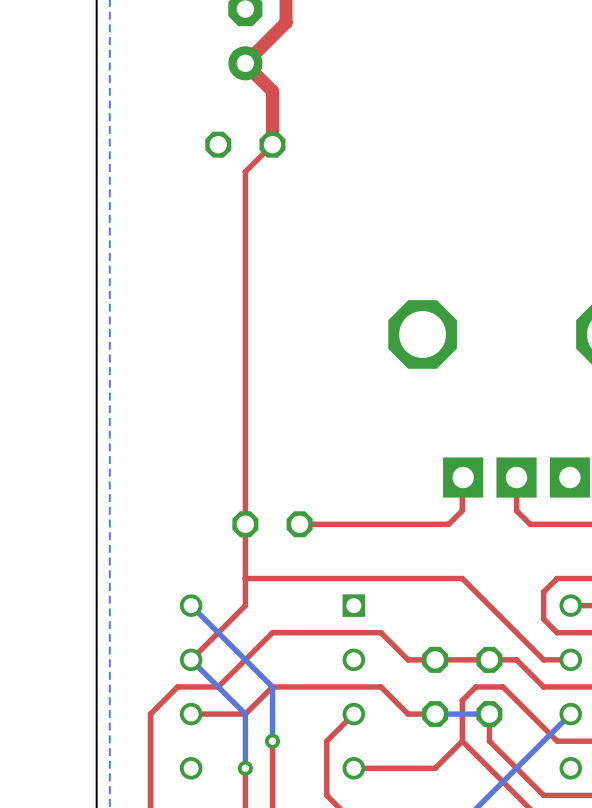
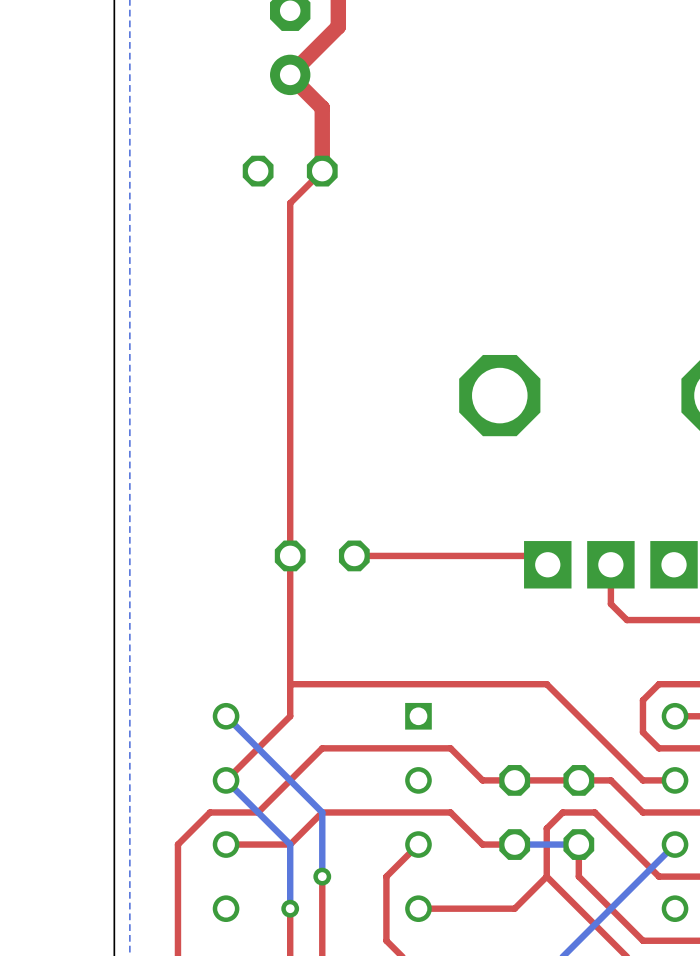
top track: (463, 477) (462, 510) (448, 524) (299, 524) -> (547, 564) (538, 555) (354, 555)
part position: (272, 524) -> (322, 555)

